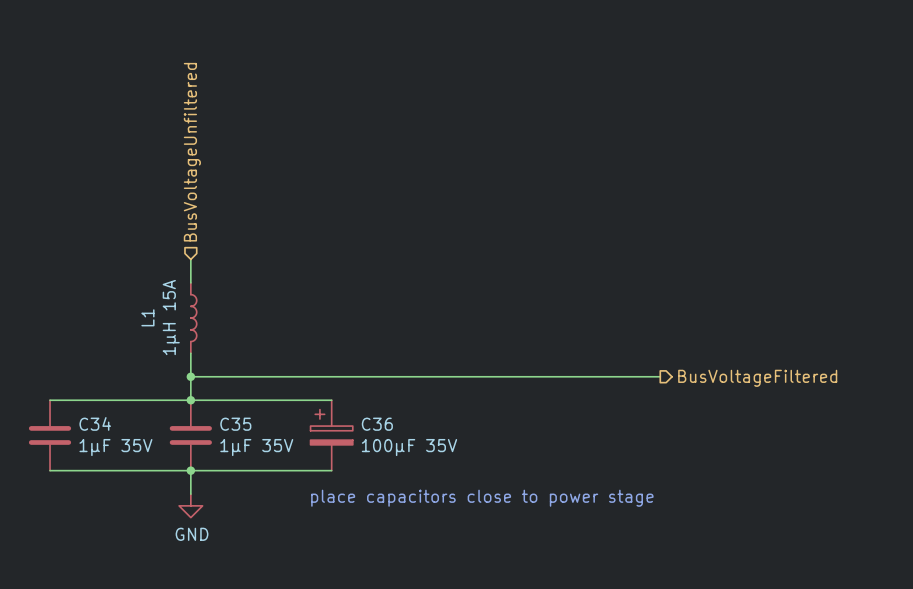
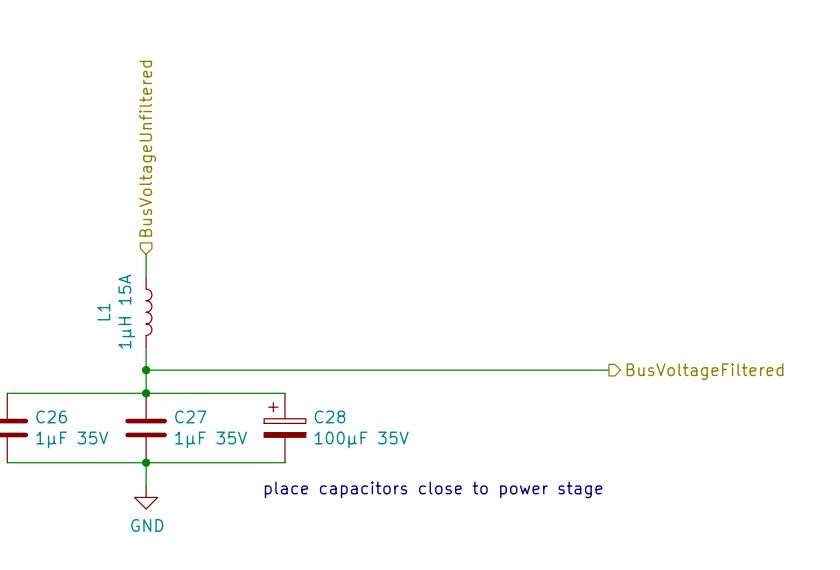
C34 name: C34 (95, 423) -> C26 (51, 416)
C35 name: C35 (235, 424) -> C27 (190, 416)
C36 name: C36 (377, 424) -> C28 (330, 416)

